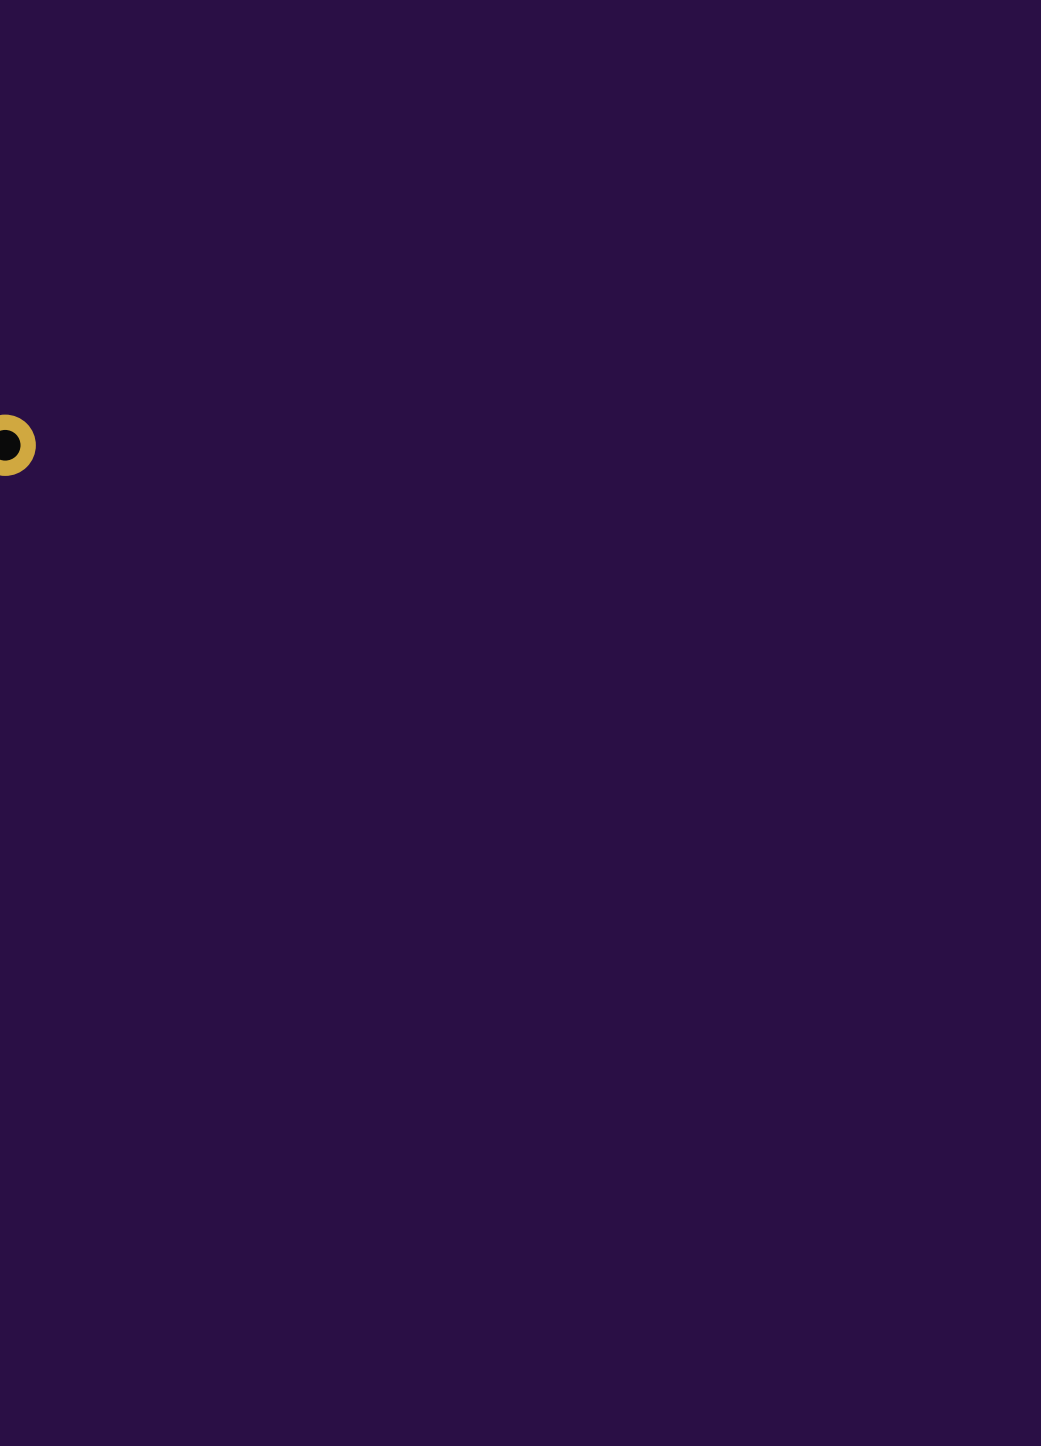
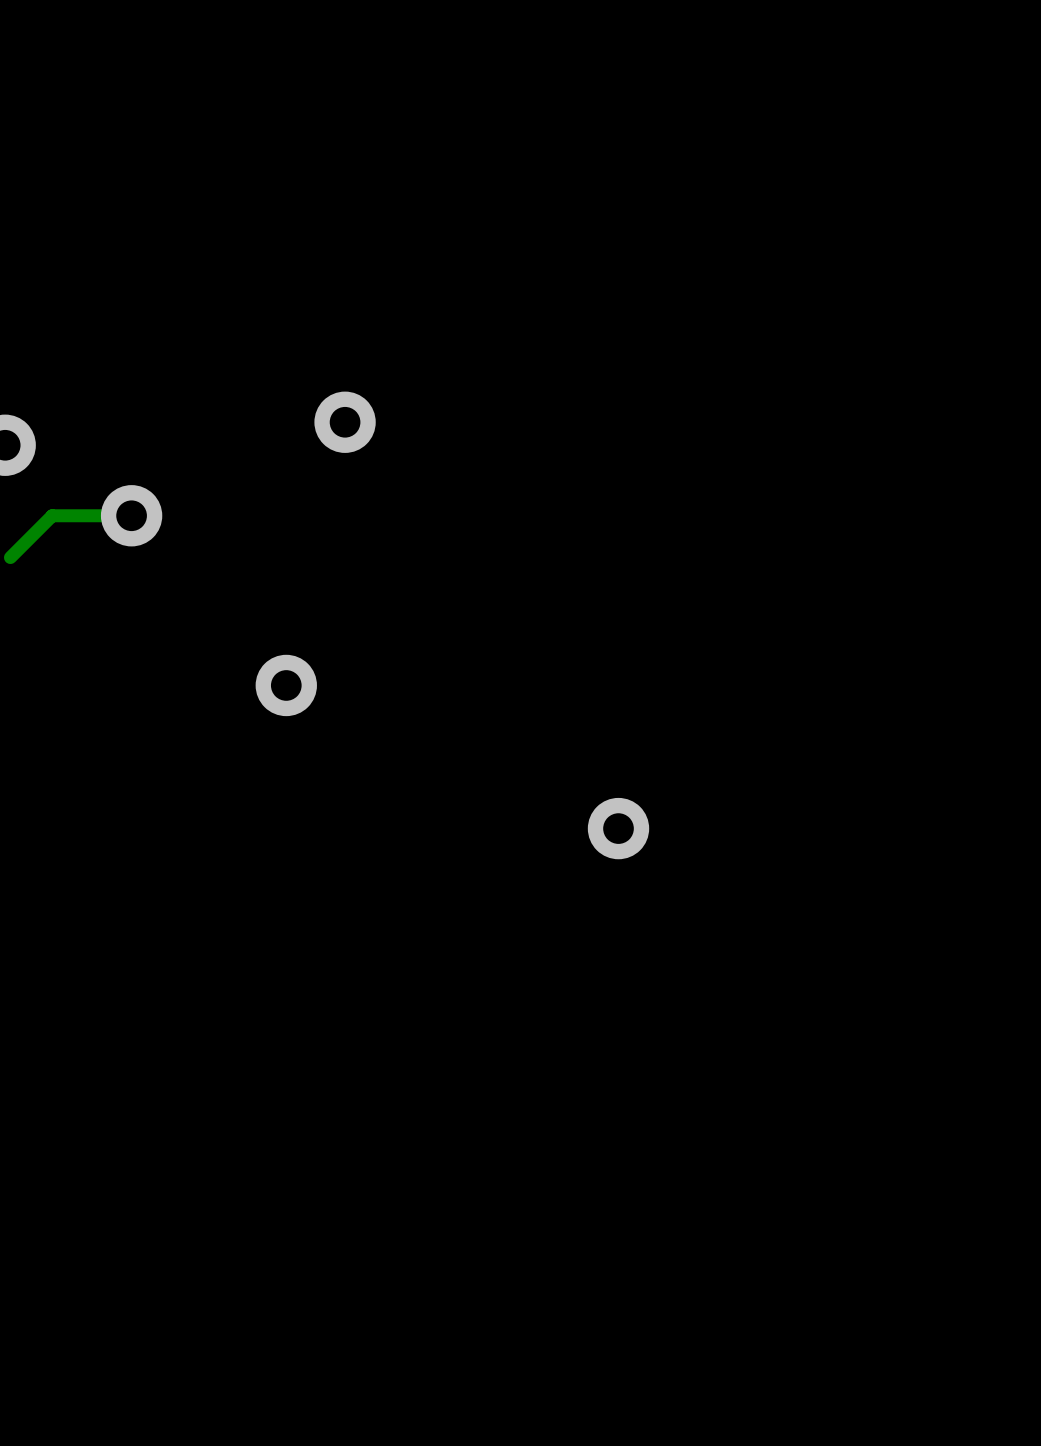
via: none -> (345, 422)
track: none -> (131, 515) (52, 515) (10, 557)
via: none -> (131, 515)
via: none -> (286, 685)
via: none -> (618, 828)

